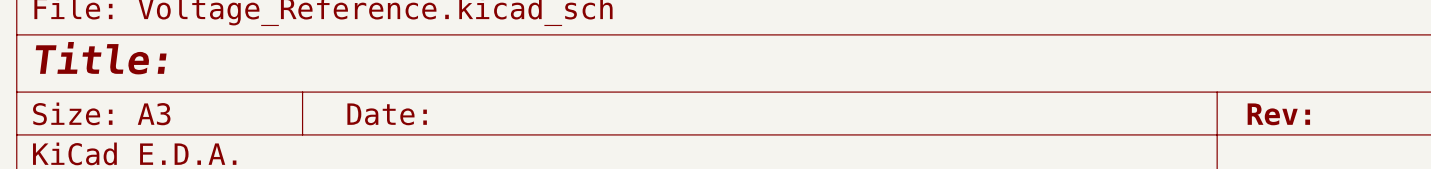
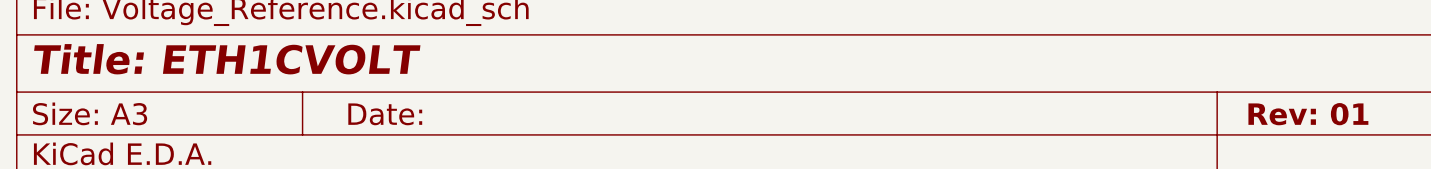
title block: Title: (101, 58) -> Title: ETH1CVOLT (227, 59)
title block: Rev: (1278, 114) -> Rev: 01 (1308, 114)

